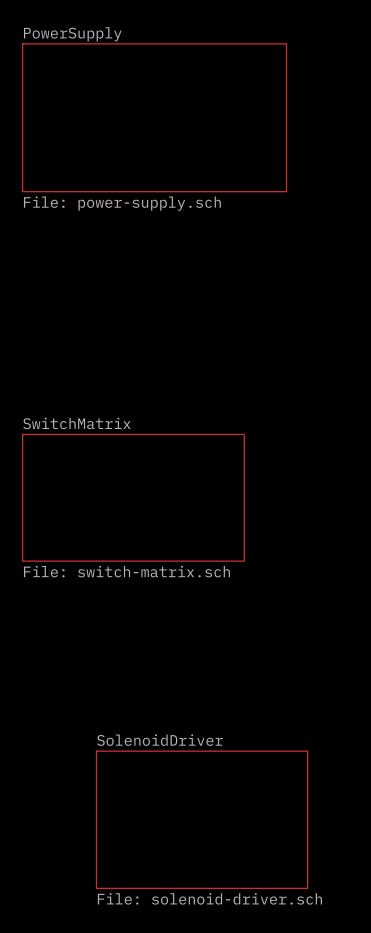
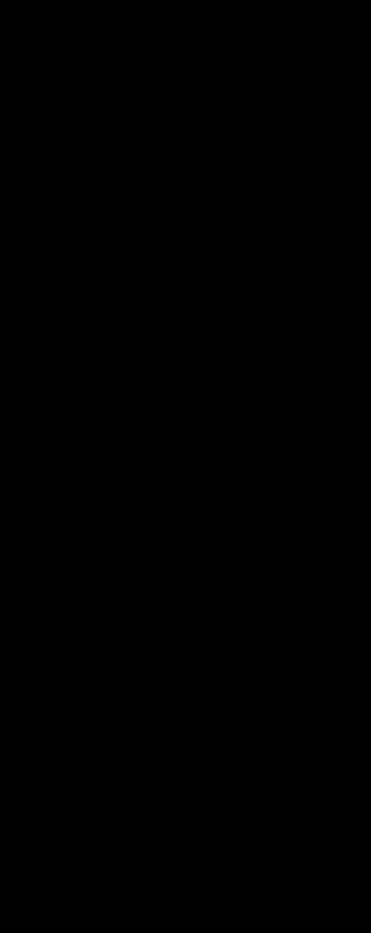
sheet PowerSupply: File: power-supply.sch (154, 117) -> none
sheet SwitchMatrix: File: switch-matrix.sch (133, 497) -> none
sheet SolenoidDriver: File: solenoid-driver.sch (202, 819) -> none

